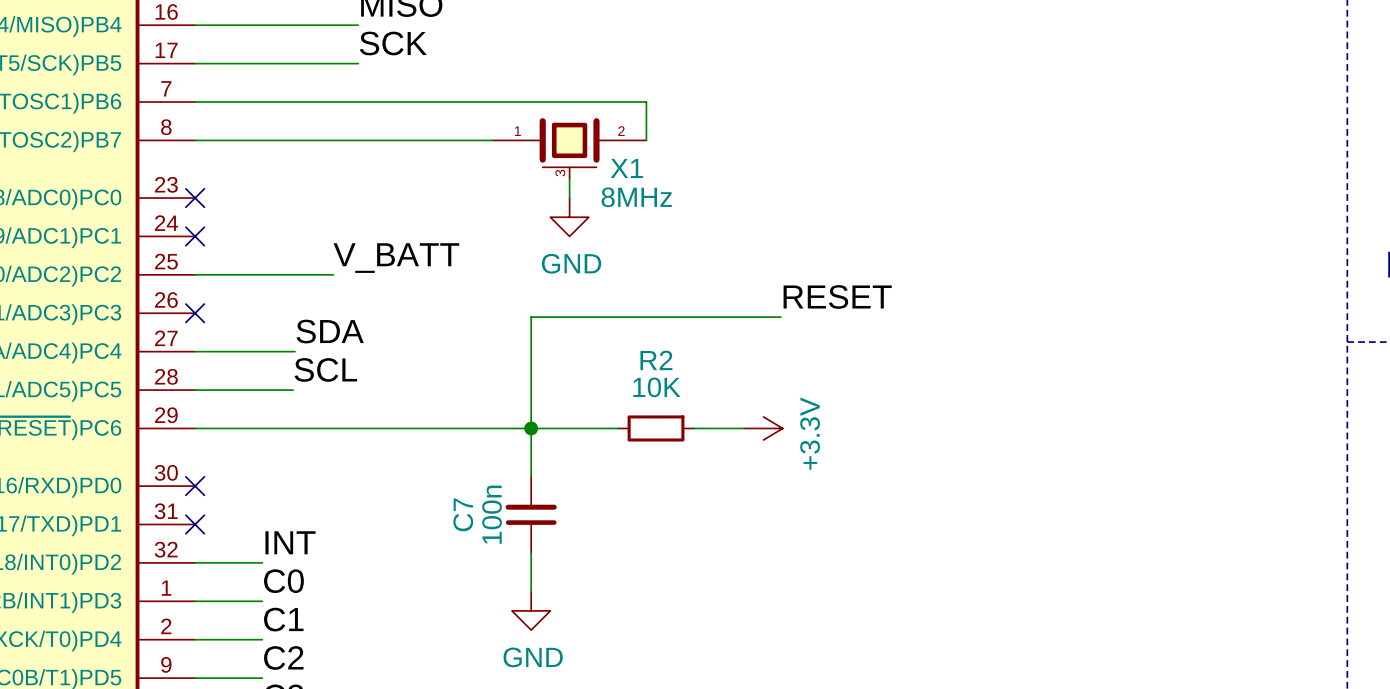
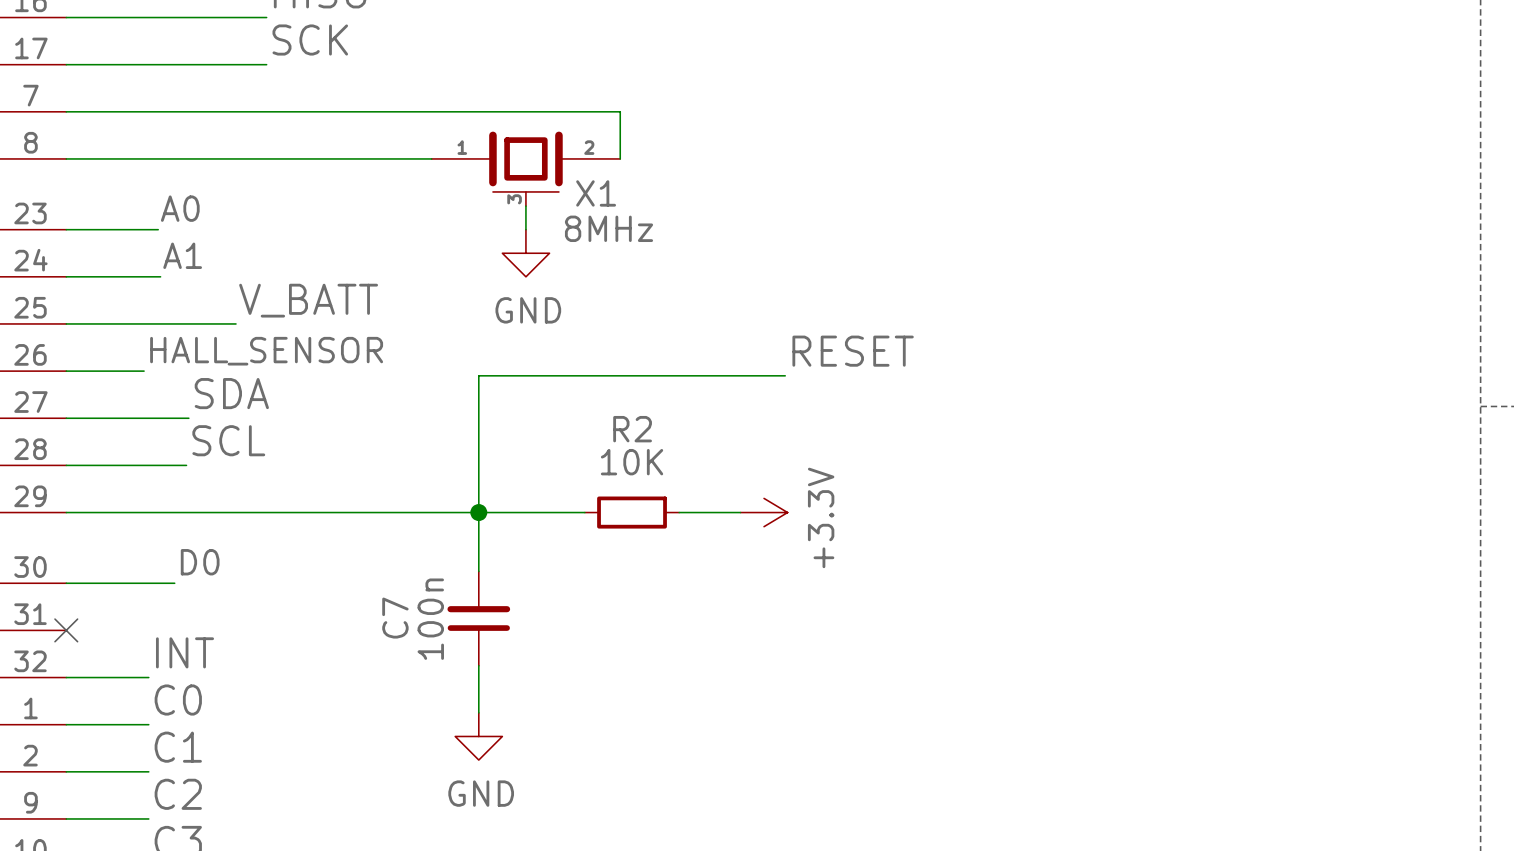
label: none -> A0 (180, 208)
wire: none -> (66, 229) (158, 229)
no-connect mark: (195, 198) -> none
label: none -> A1 (182, 255)
wire: none -> (66, 276) (160, 276)
no-connect mark: (195, 236) -> none
label: none -> HALL_SENSOR (266, 351)
wire: none -> (66, 371) (144, 371)
no-connect mark: (195, 313) -> none
label: none -> D0 (200, 562)
wire: none -> (66, 583) (174, 583)
no-connect mark: (195, 486) -> none

